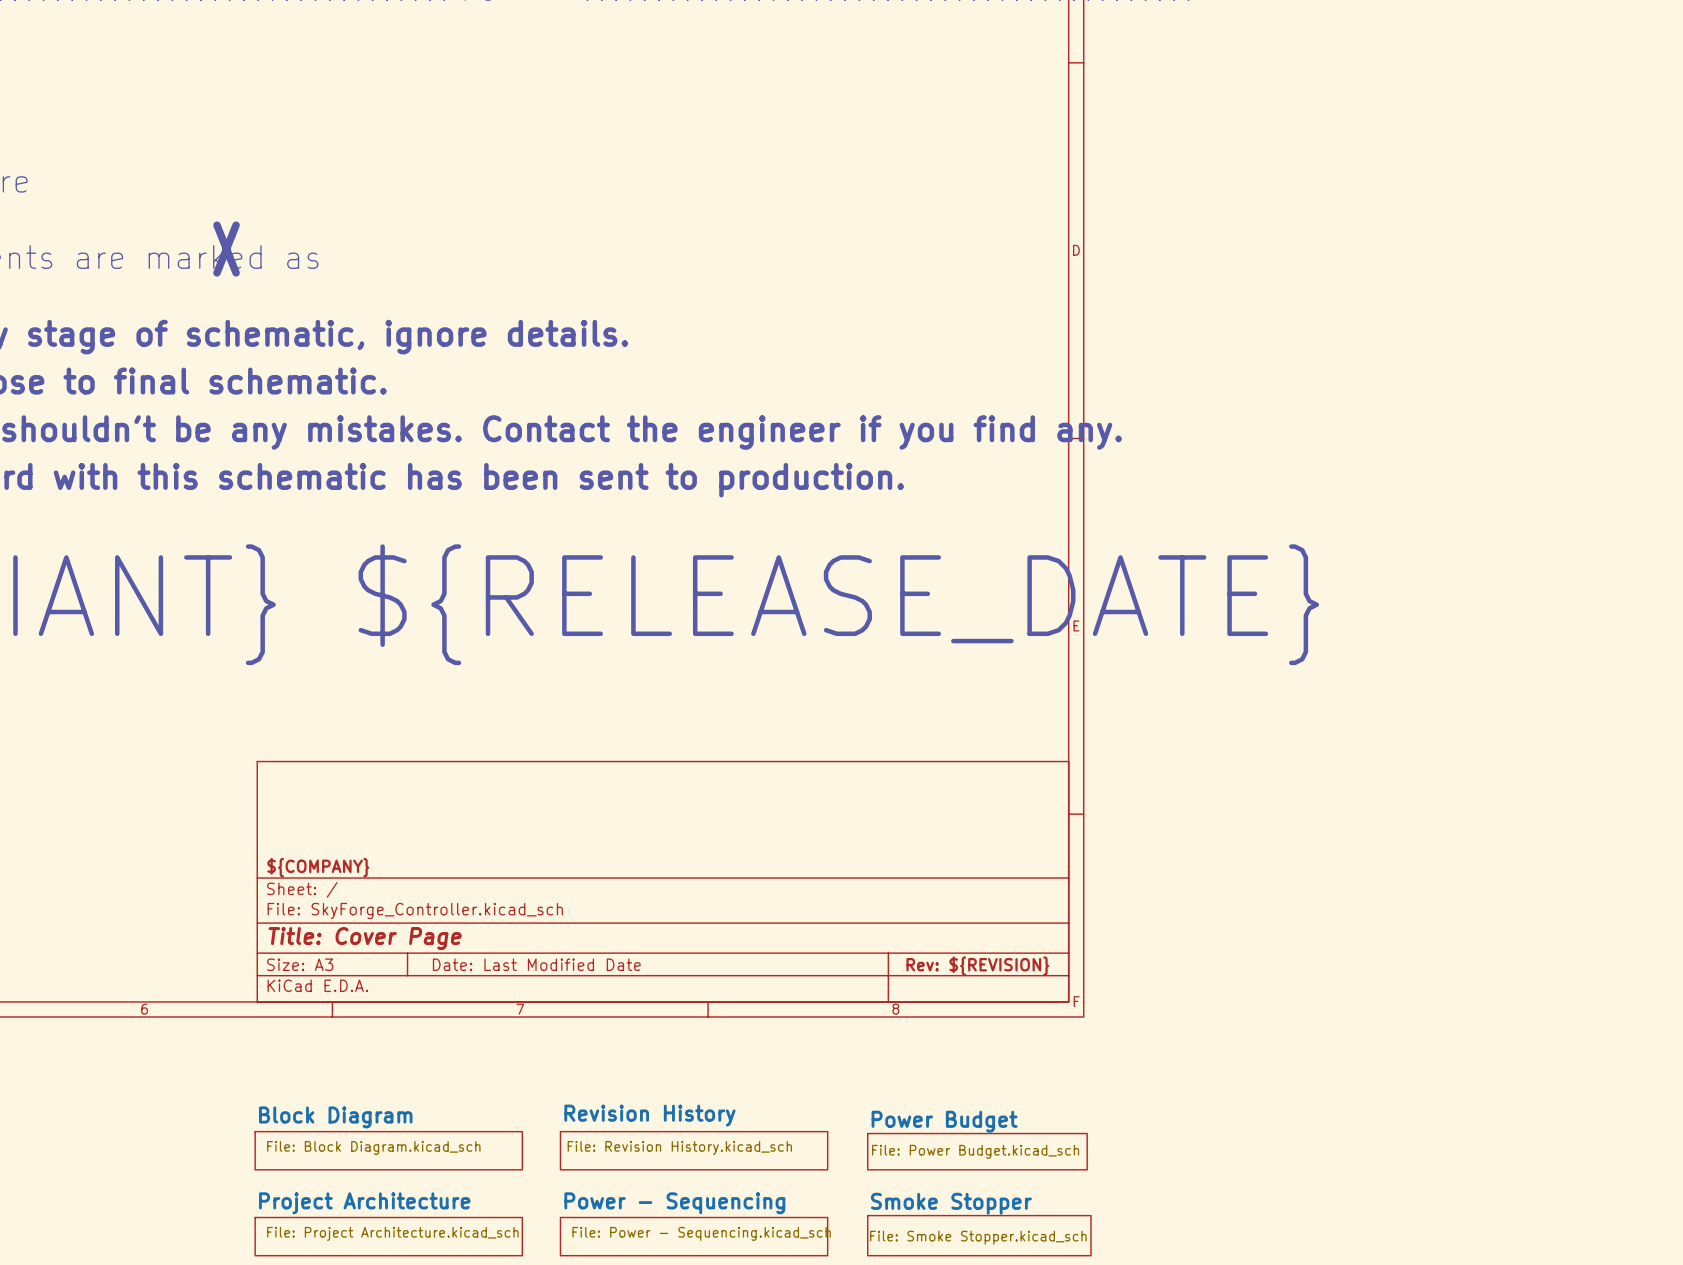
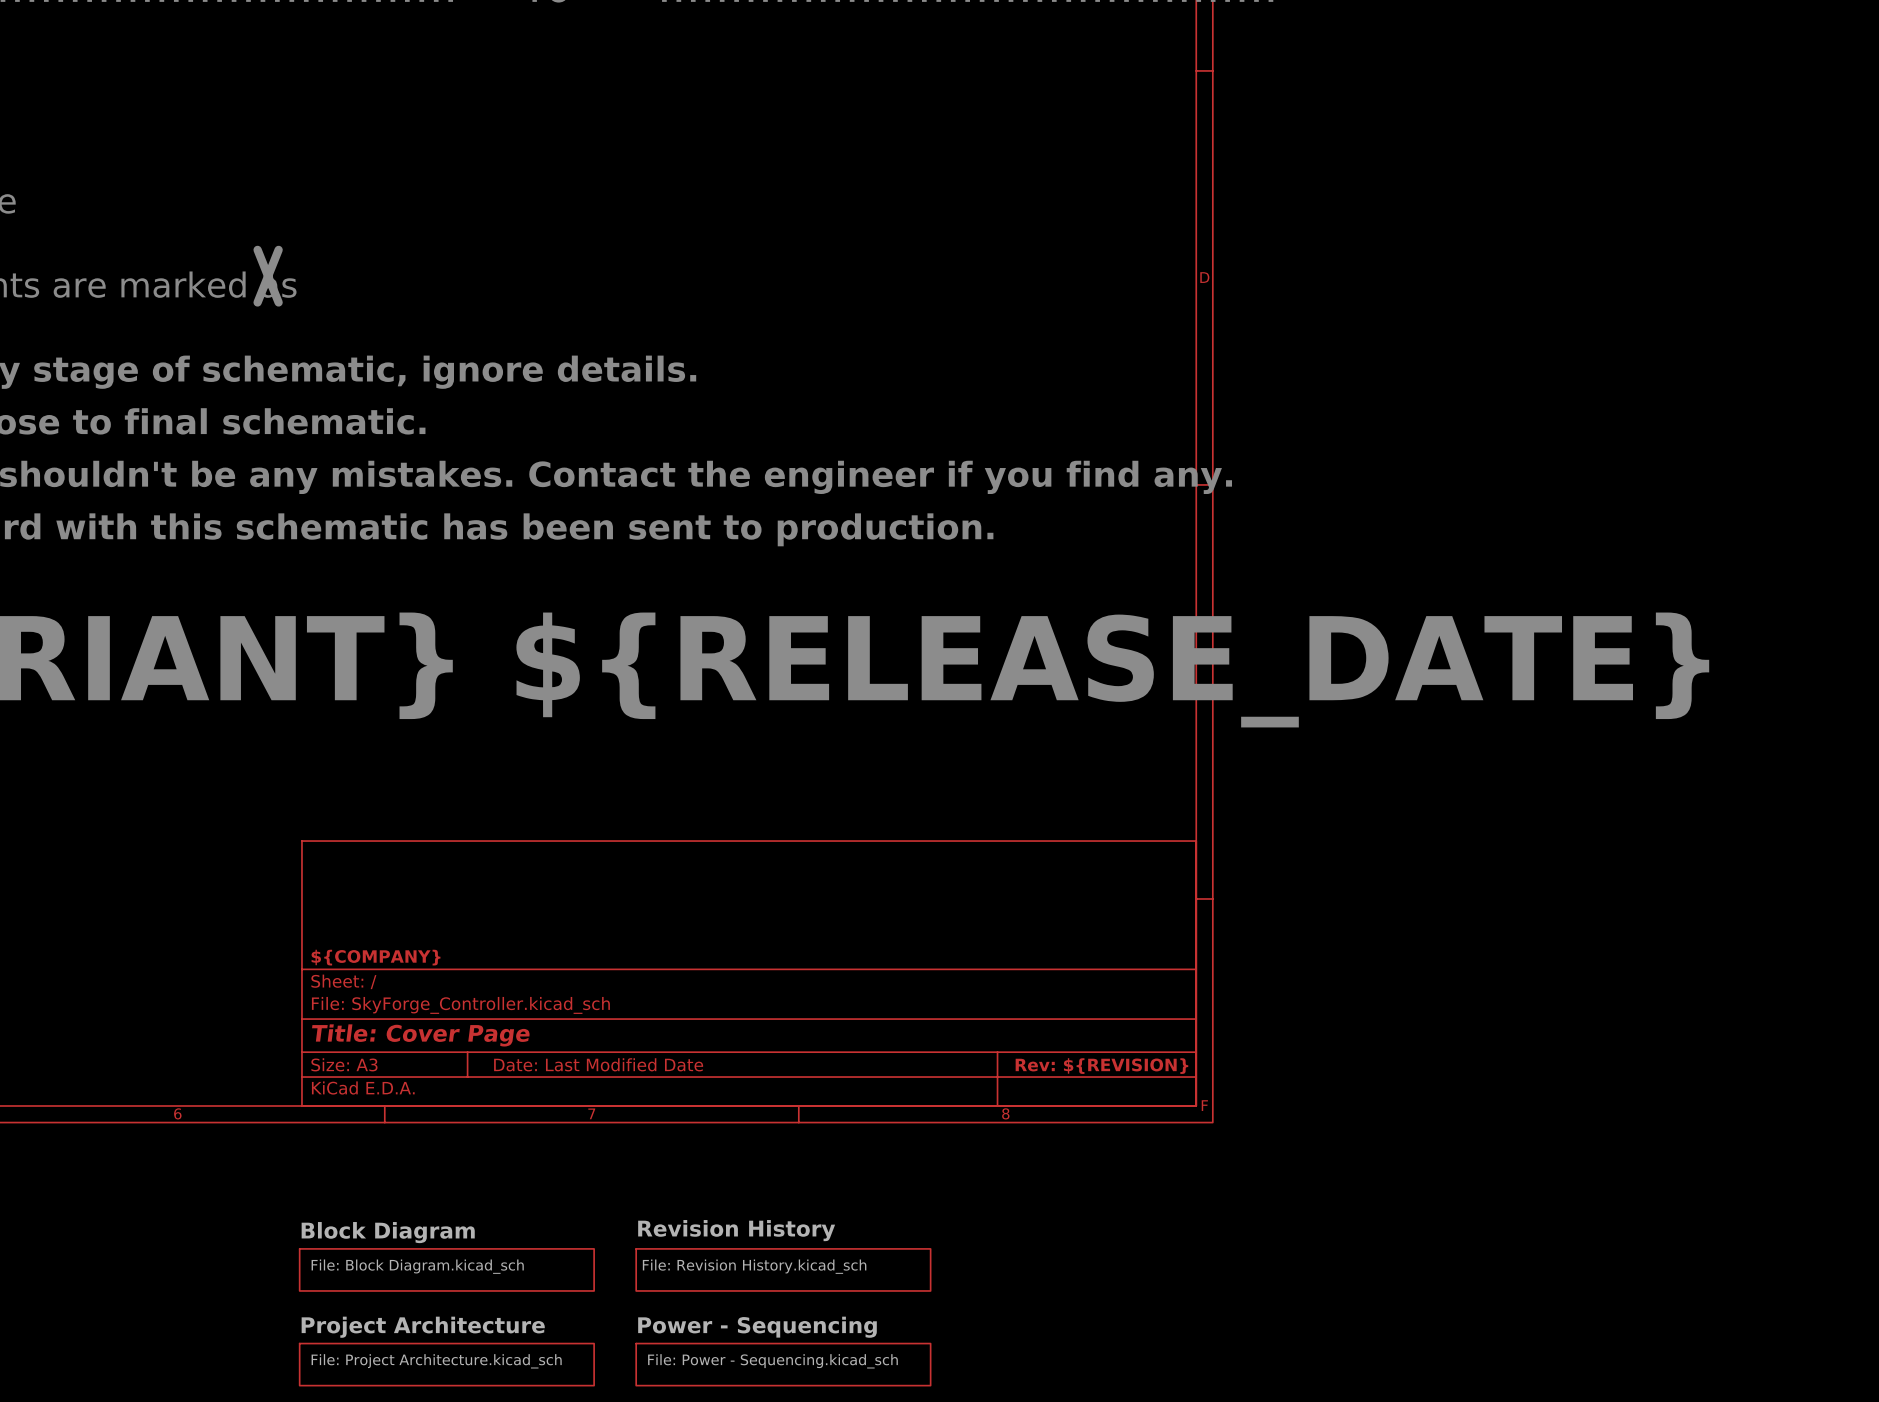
sheet Power Budget: File: Power Budget.kicad_sch (977, 1151) -> none
sheet Smoke Stopper: File: Smoke Stopper.kicad_sch (979, 1235) -> none

